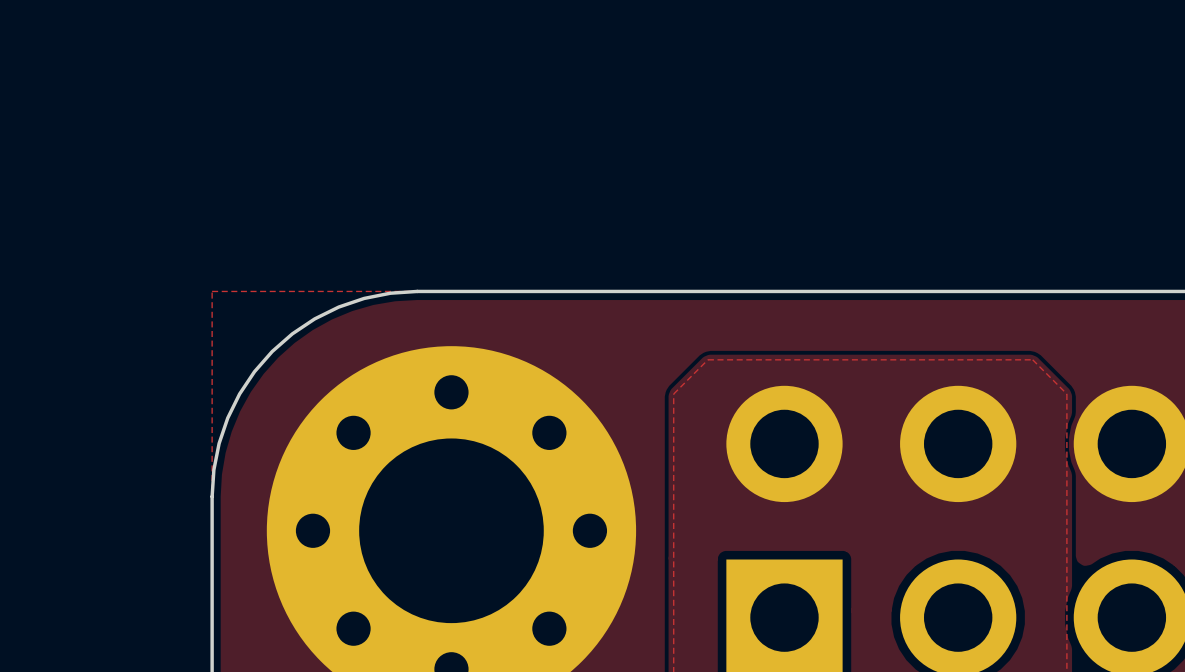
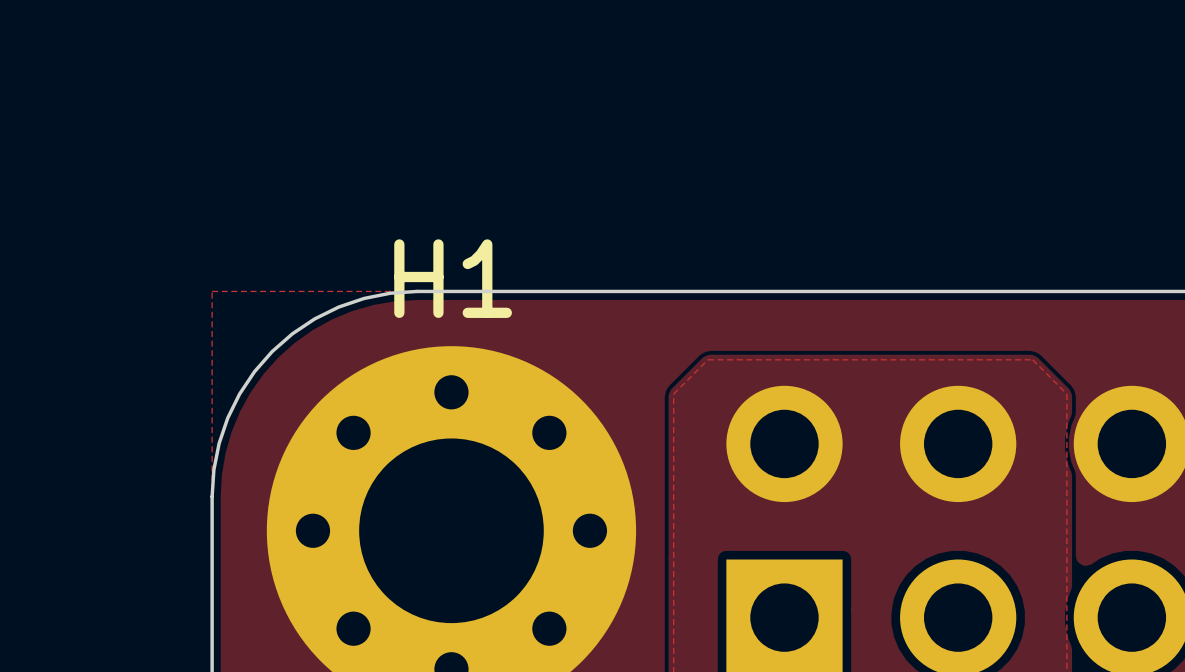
H1 name: none -> H1 (453, 278)

